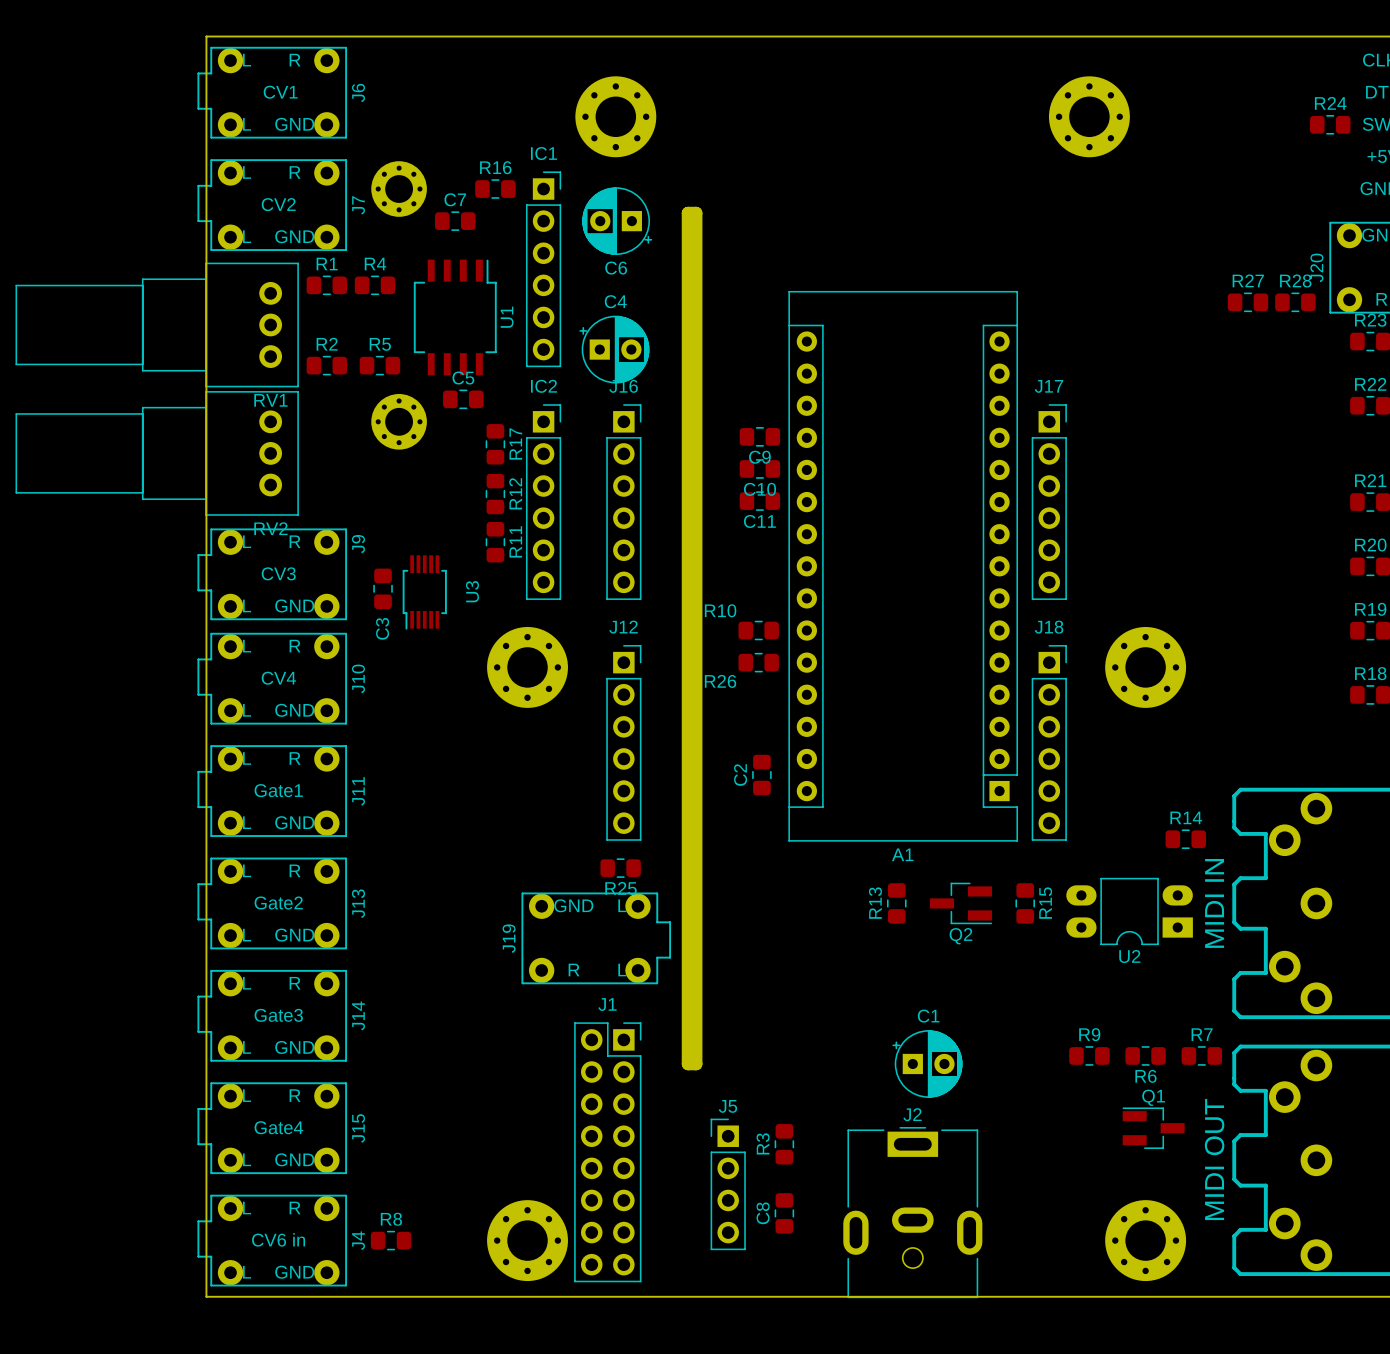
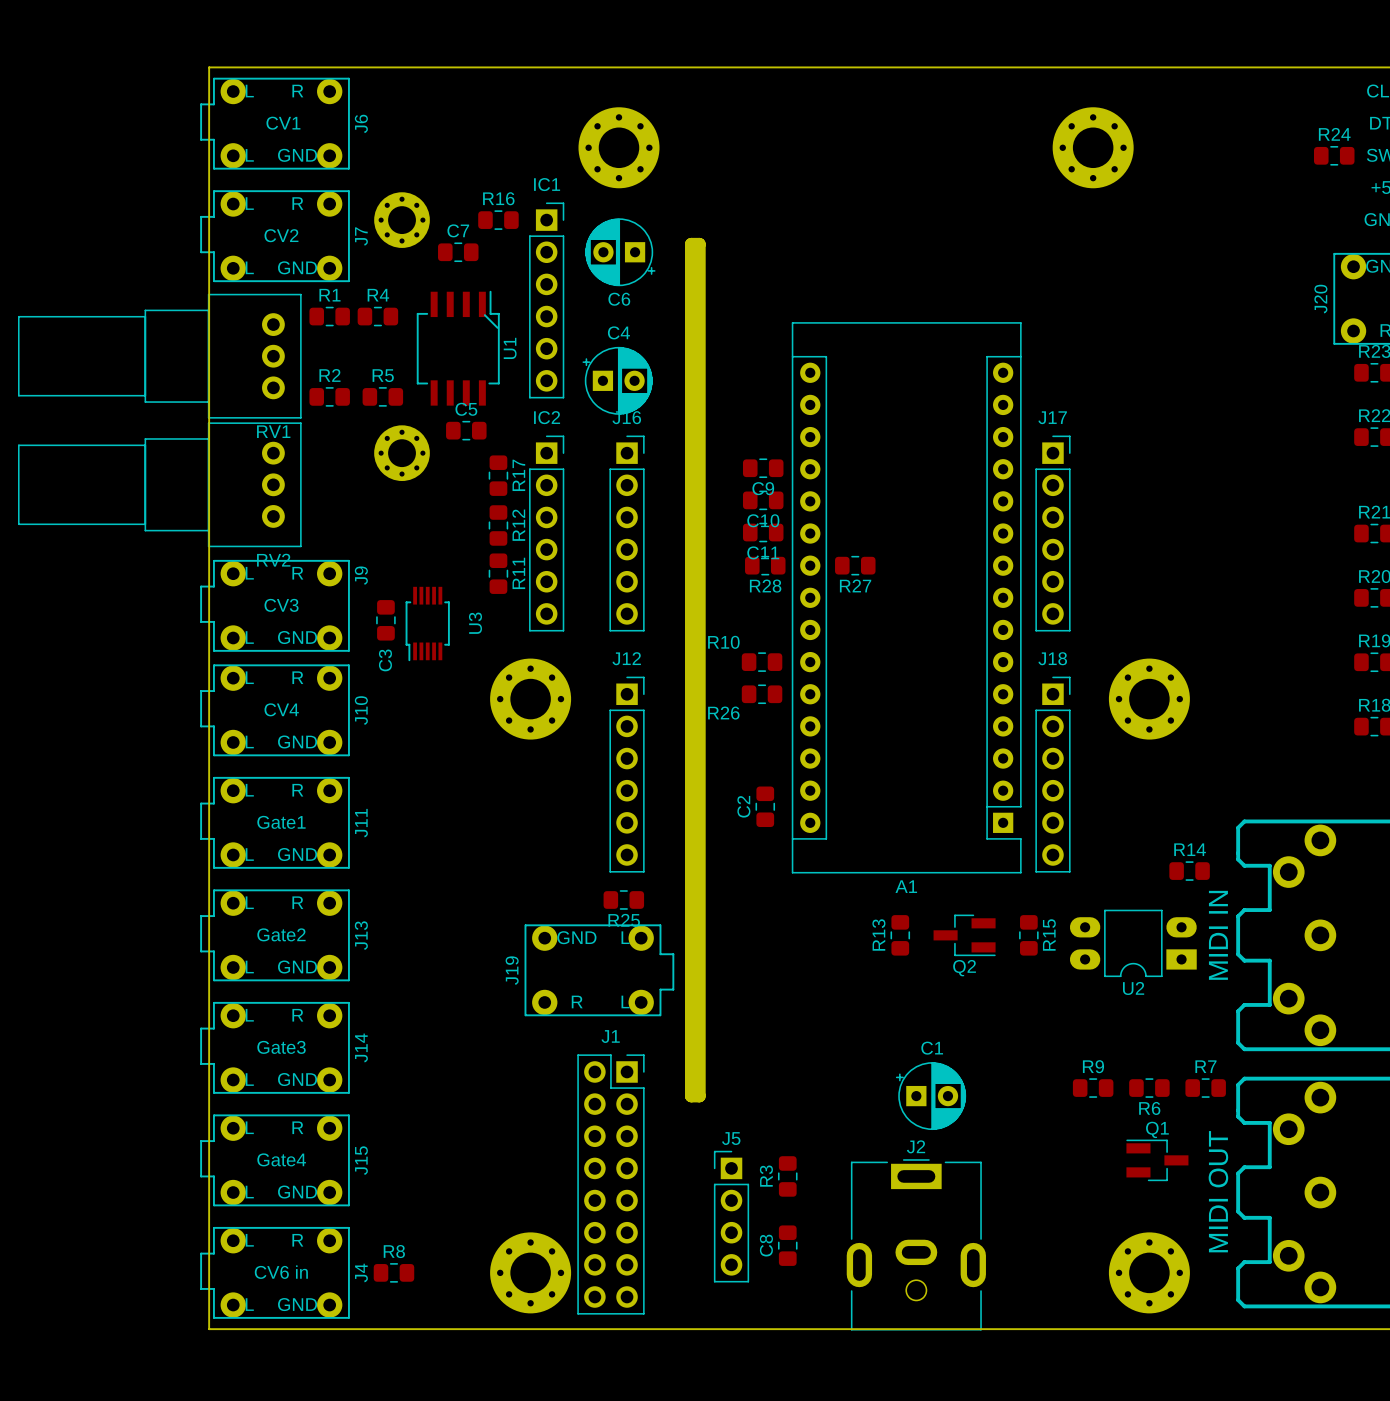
U1 footprint: [413, 259, 497, 376] -> [416, 290, 500, 406]
R27 name position: R27 (1248, 280) -> R27 (855, 585)
R28 name position: R28 (1295, 280) -> R28 (765, 586)
R27 position: (1247, 302) -> (855, 565)
R28 position: (1295, 302) -> (765, 565)

